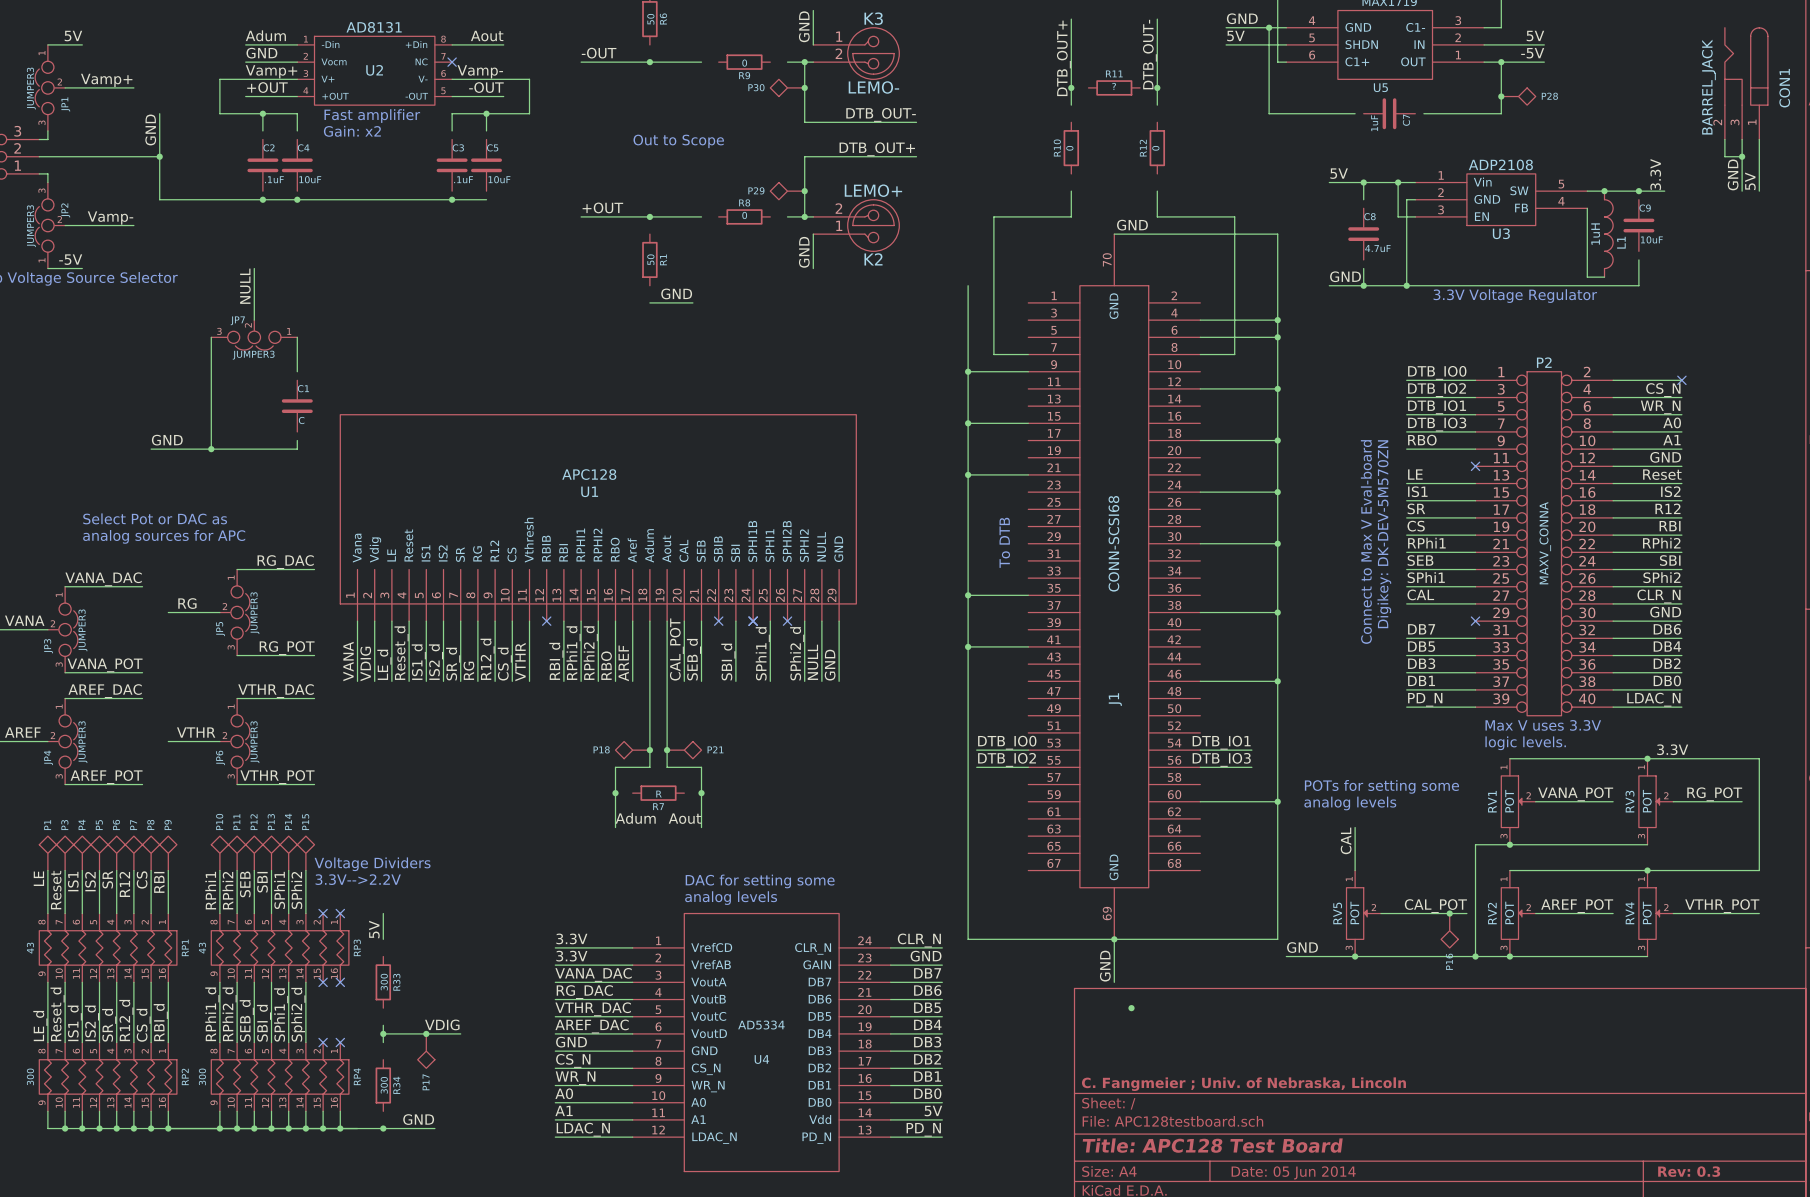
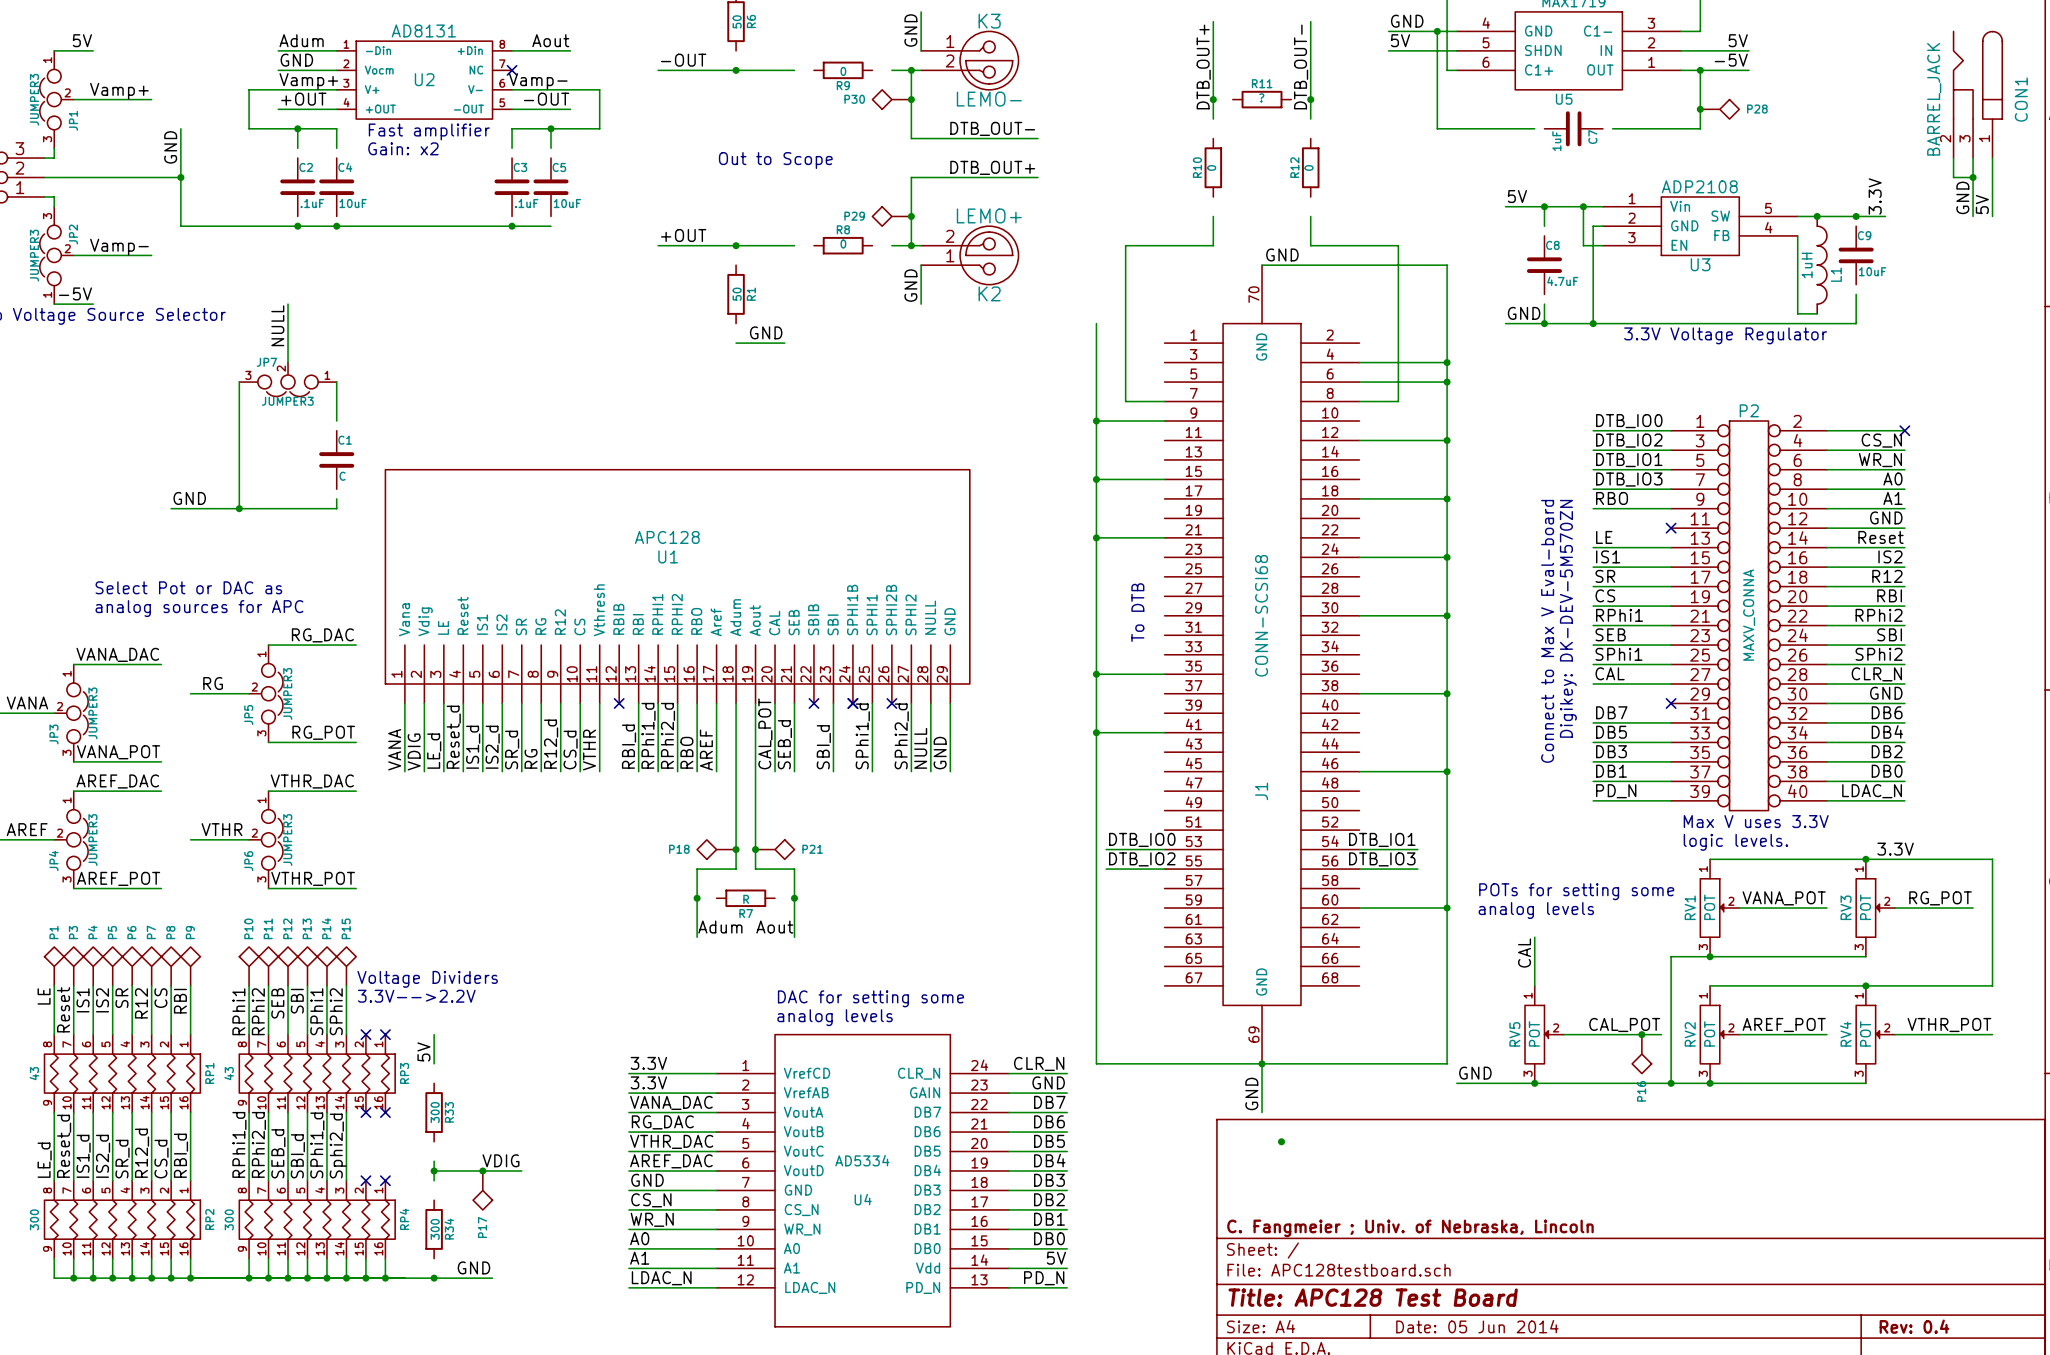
title block: Rev: 0.3 (1689, 1171) -> Rev: 0.4 (1914, 1326)

